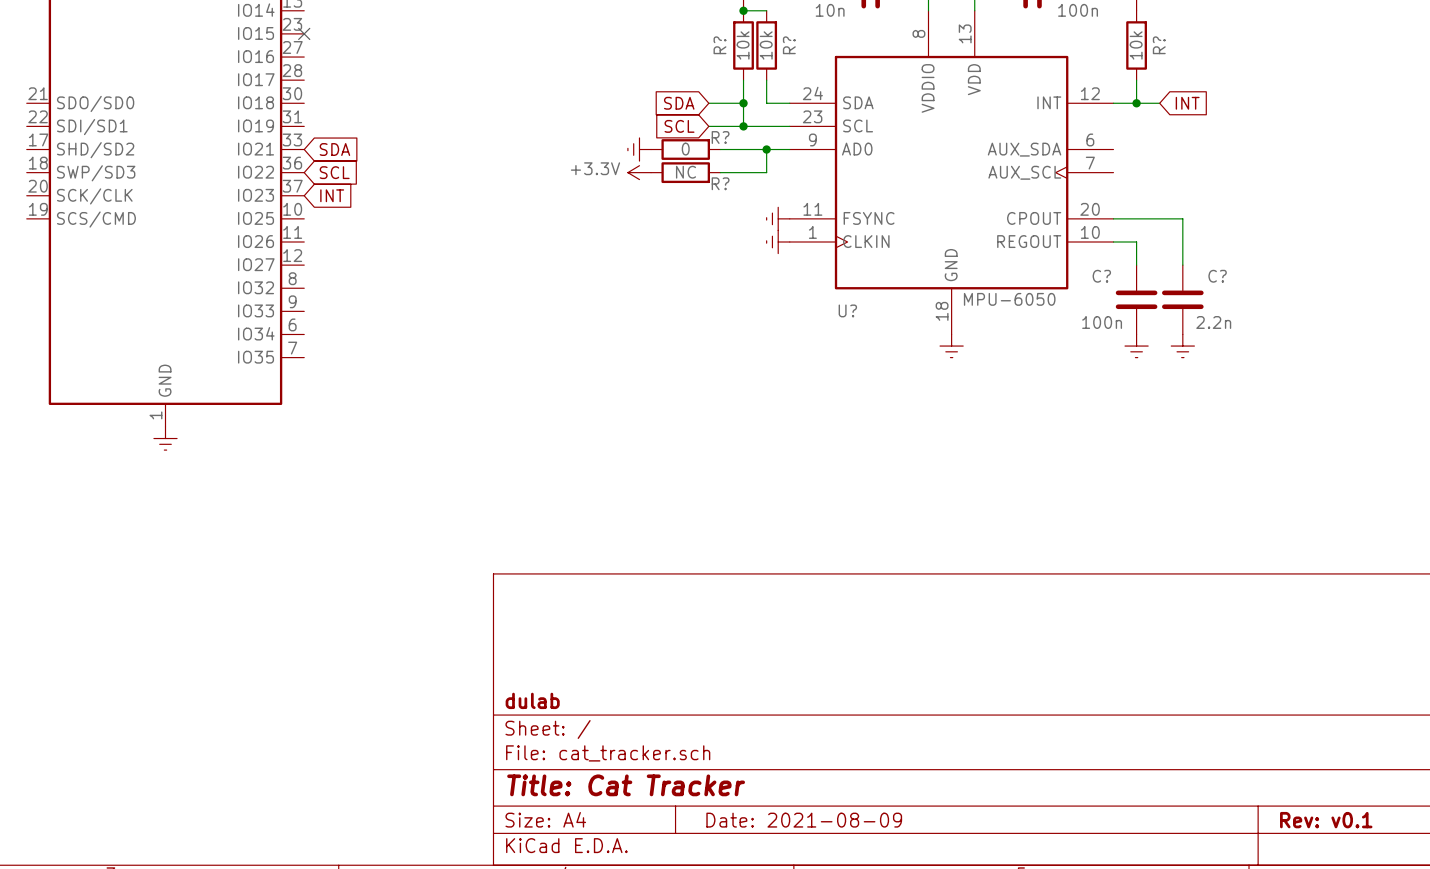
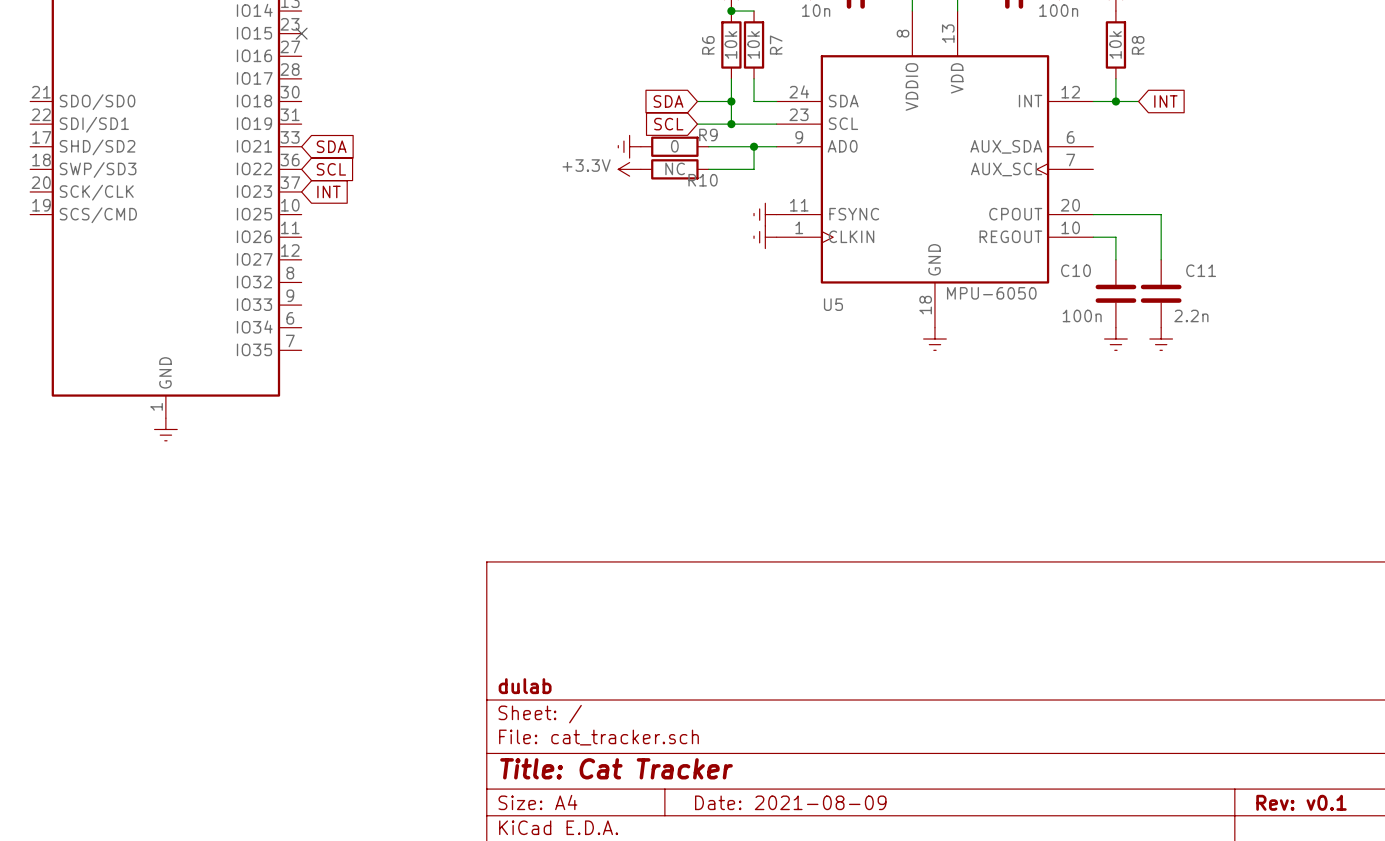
R? name: R? (719, 45) -> R6 (708, 45)
R? name: R? (789, 45) -> R7 (776, 45)
R? name: R? (1159, 45) -> R8 (1138, 45)
R? name: R? (720, 137) -> R9 (708, 135)
R? name: R? (720, 183) -> R10 (703, 180)
C? name: C? (1101, 276) -> C10 (1075, 270)
C? name: C? (1217, 276) -> C11 (1201, 270)
U? name: U? (847, 310) -> U5 (833, 304)

